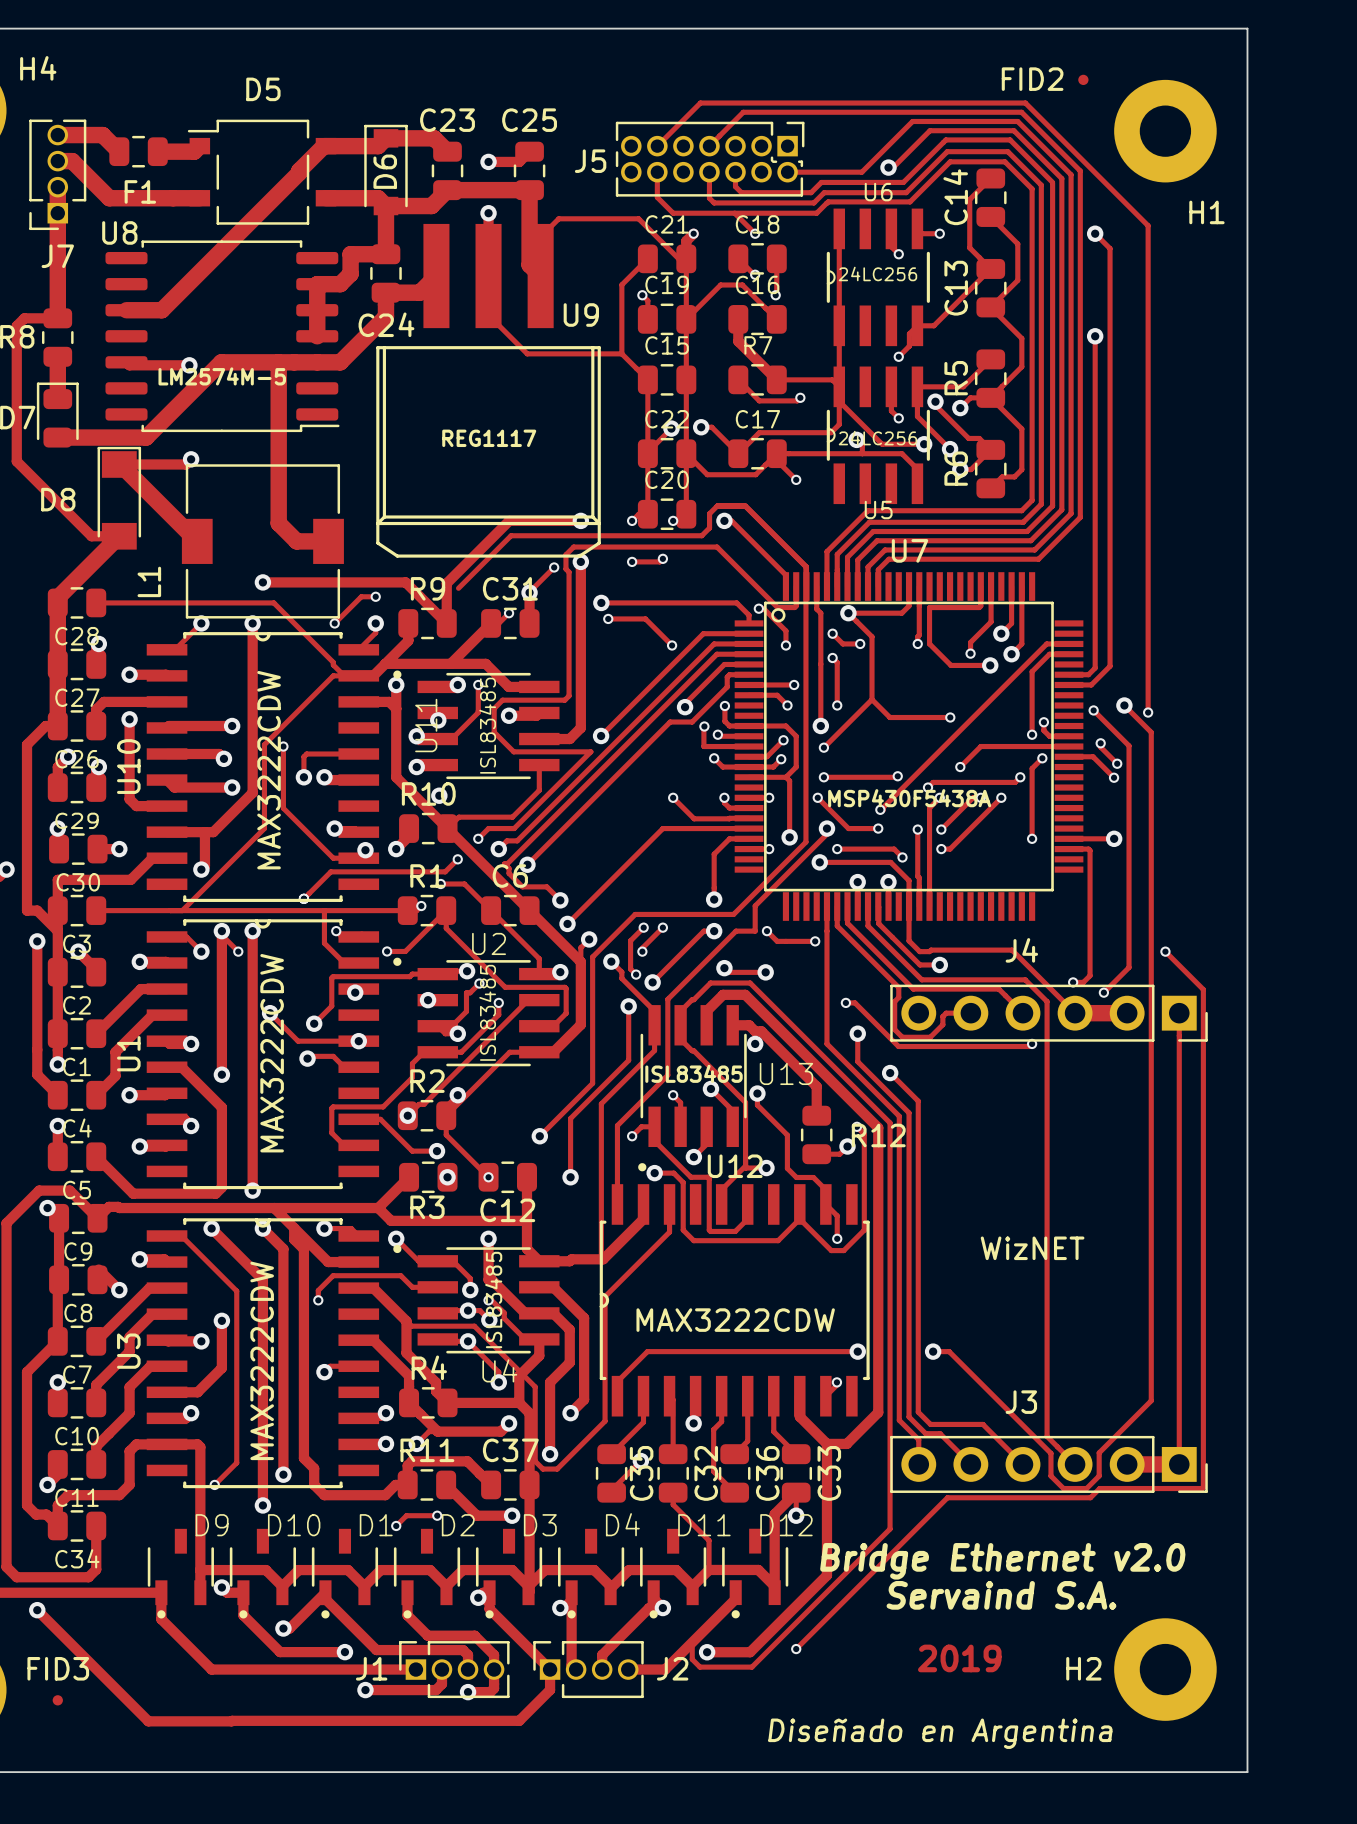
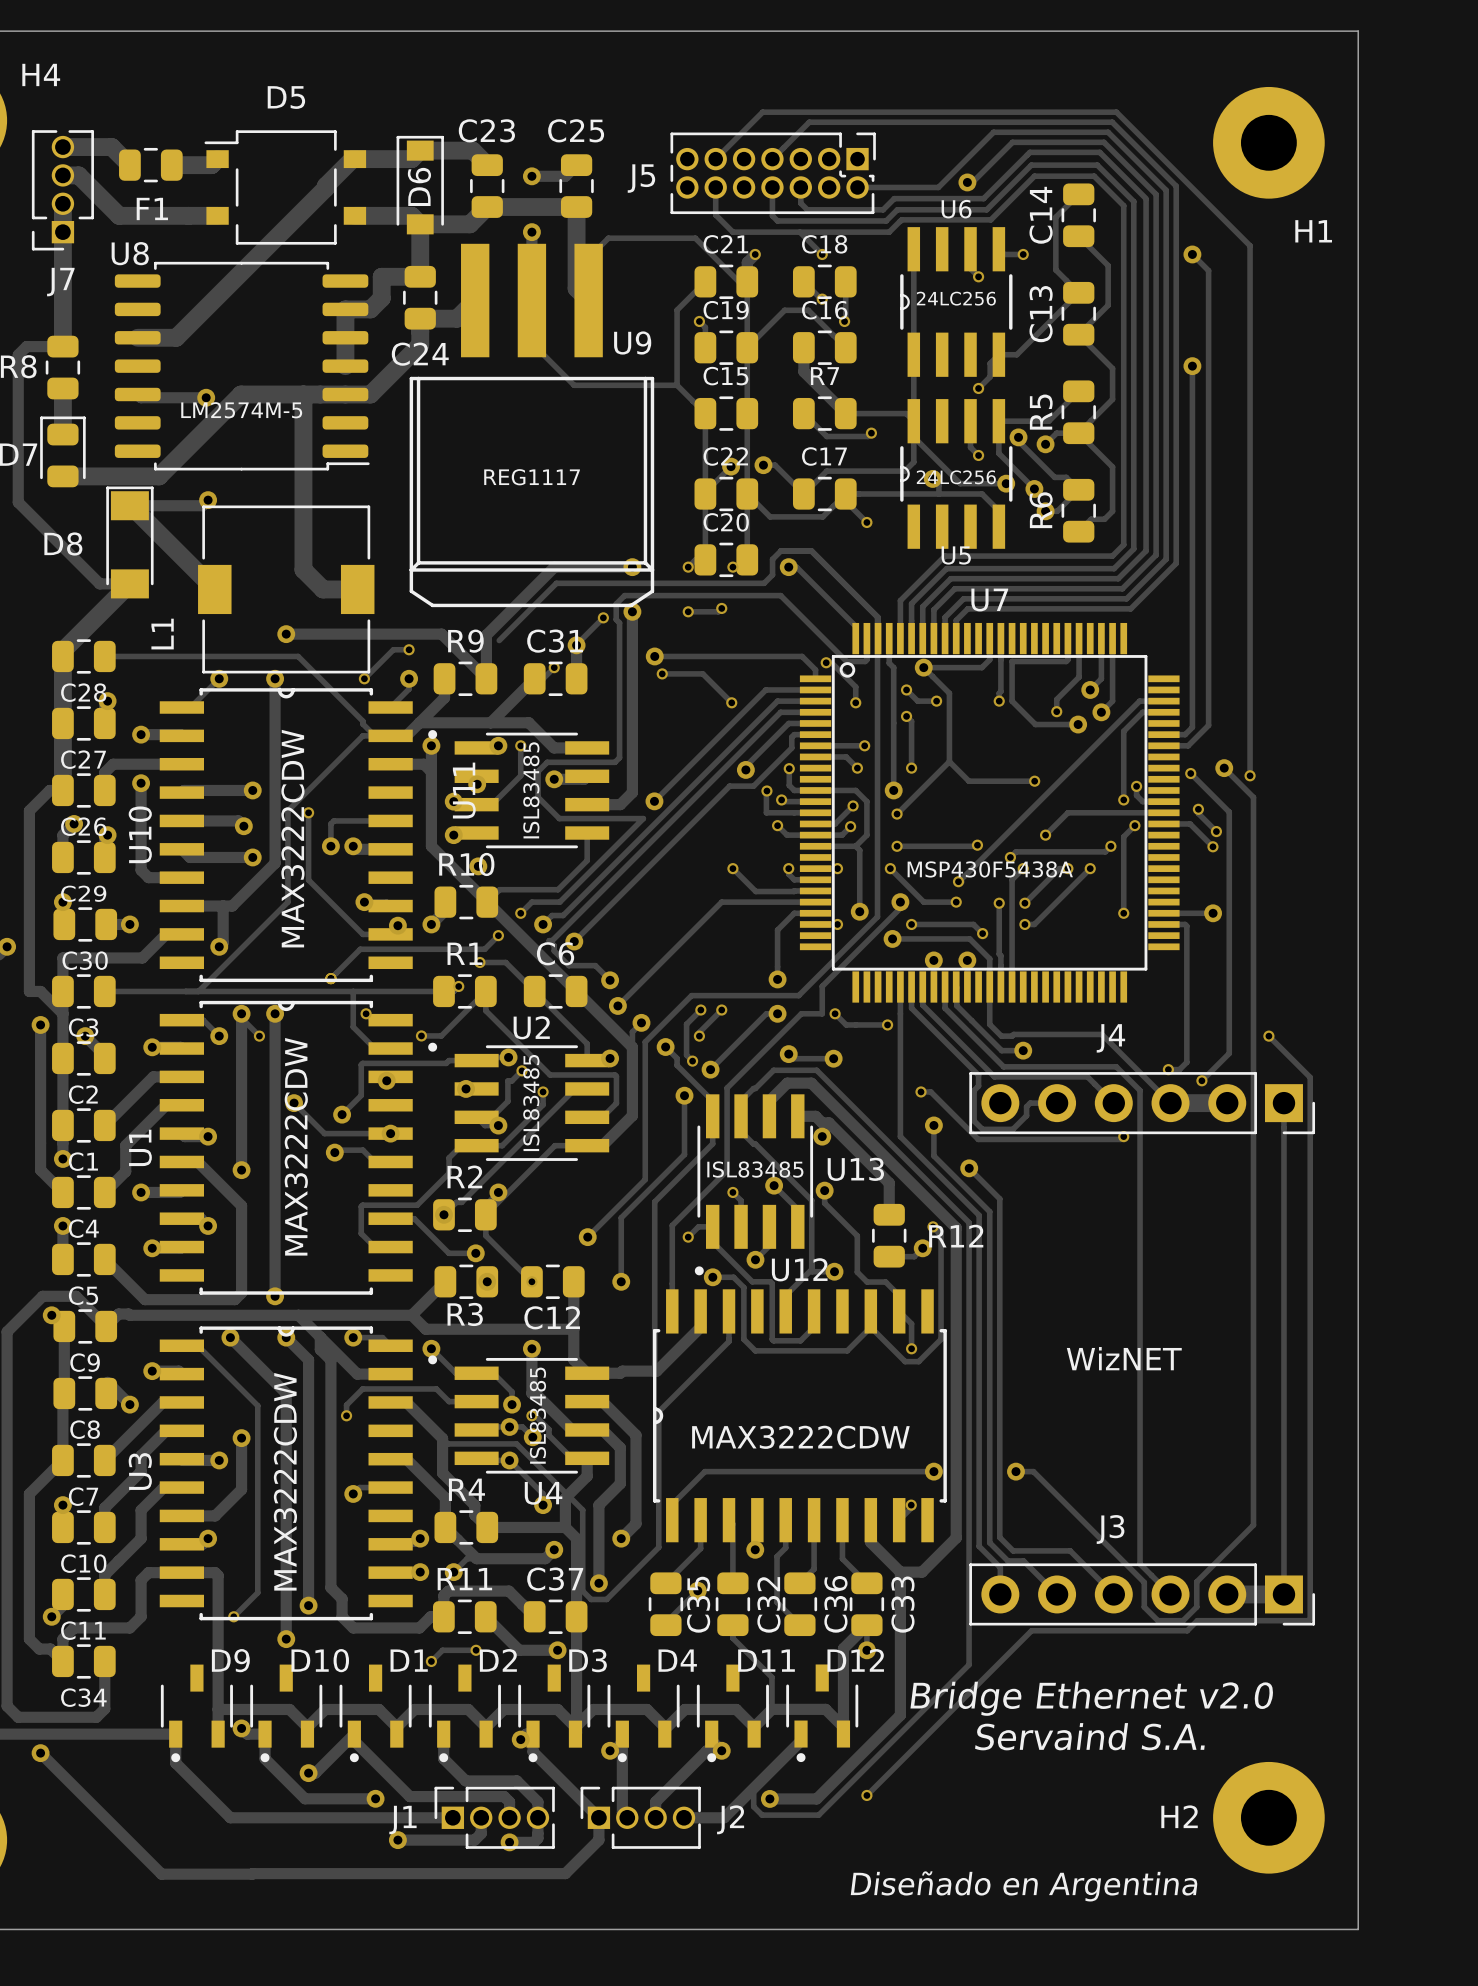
FID2: (1083, 79) -> none
text: 2019 (959, 1658) -> none
FID3: (57, 1700) -> none

